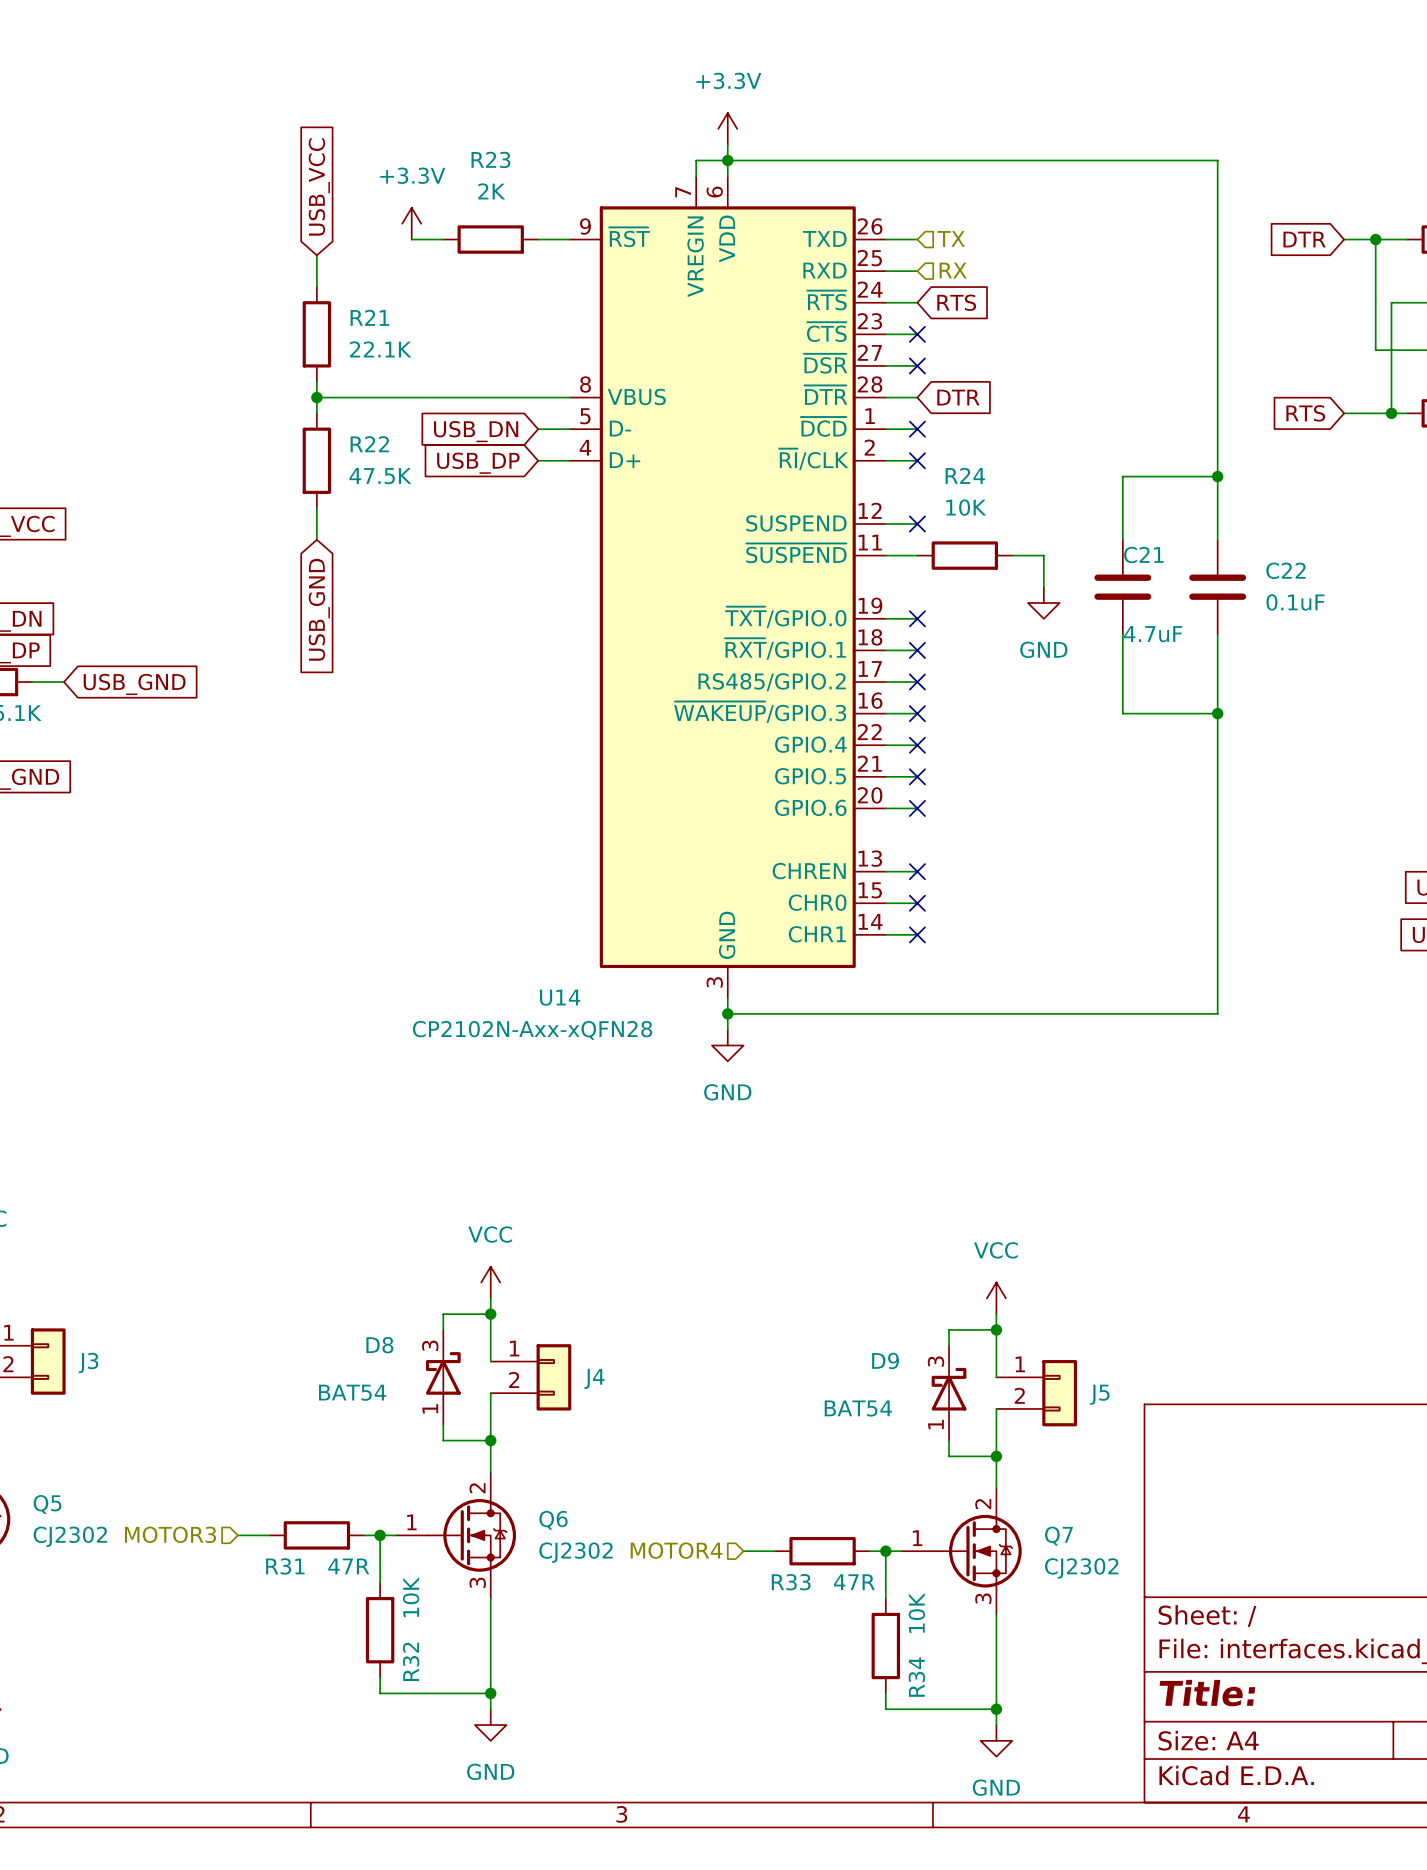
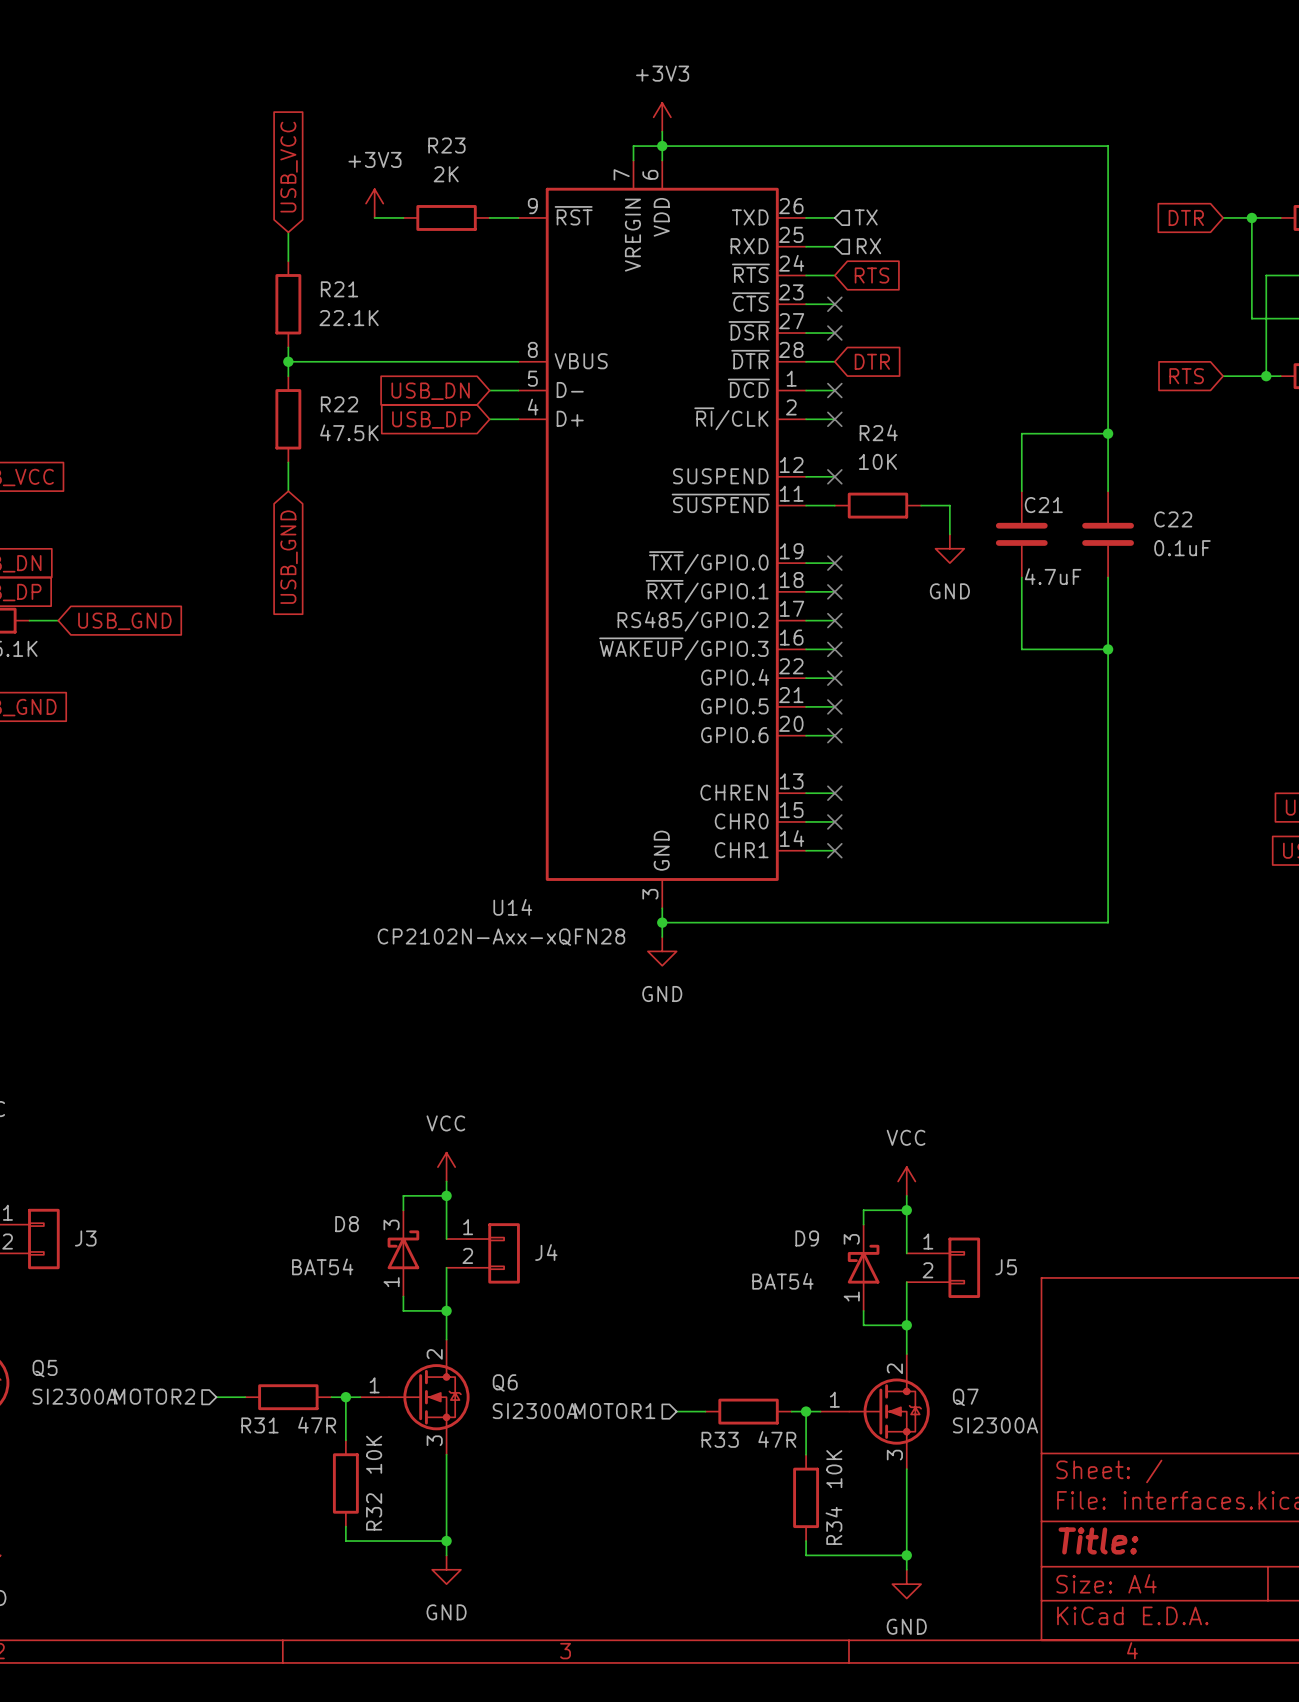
power symbol: +3.3V (727, 128) -> +3V3 (662, 117)
power symbol: +3.3V (411, 223) -> +3V3 (374, 203)
hierarchical label: MOTOR3 (170, 1534) -> MOTOR2 (154, 1396)
Q5 value: CJ2302 (70, 1536) -> SI2300A (75, 1396)
hierarchical label: MOTOR4 (676, 1550) -> MOTOR1 (614, 1411)
Q6 value: CJ2302 (576, 1552) -> SI2300A (535, 1411)
Q7 value: CJ2302 (1081, 1568) -> SI2300A (995, 1425)

